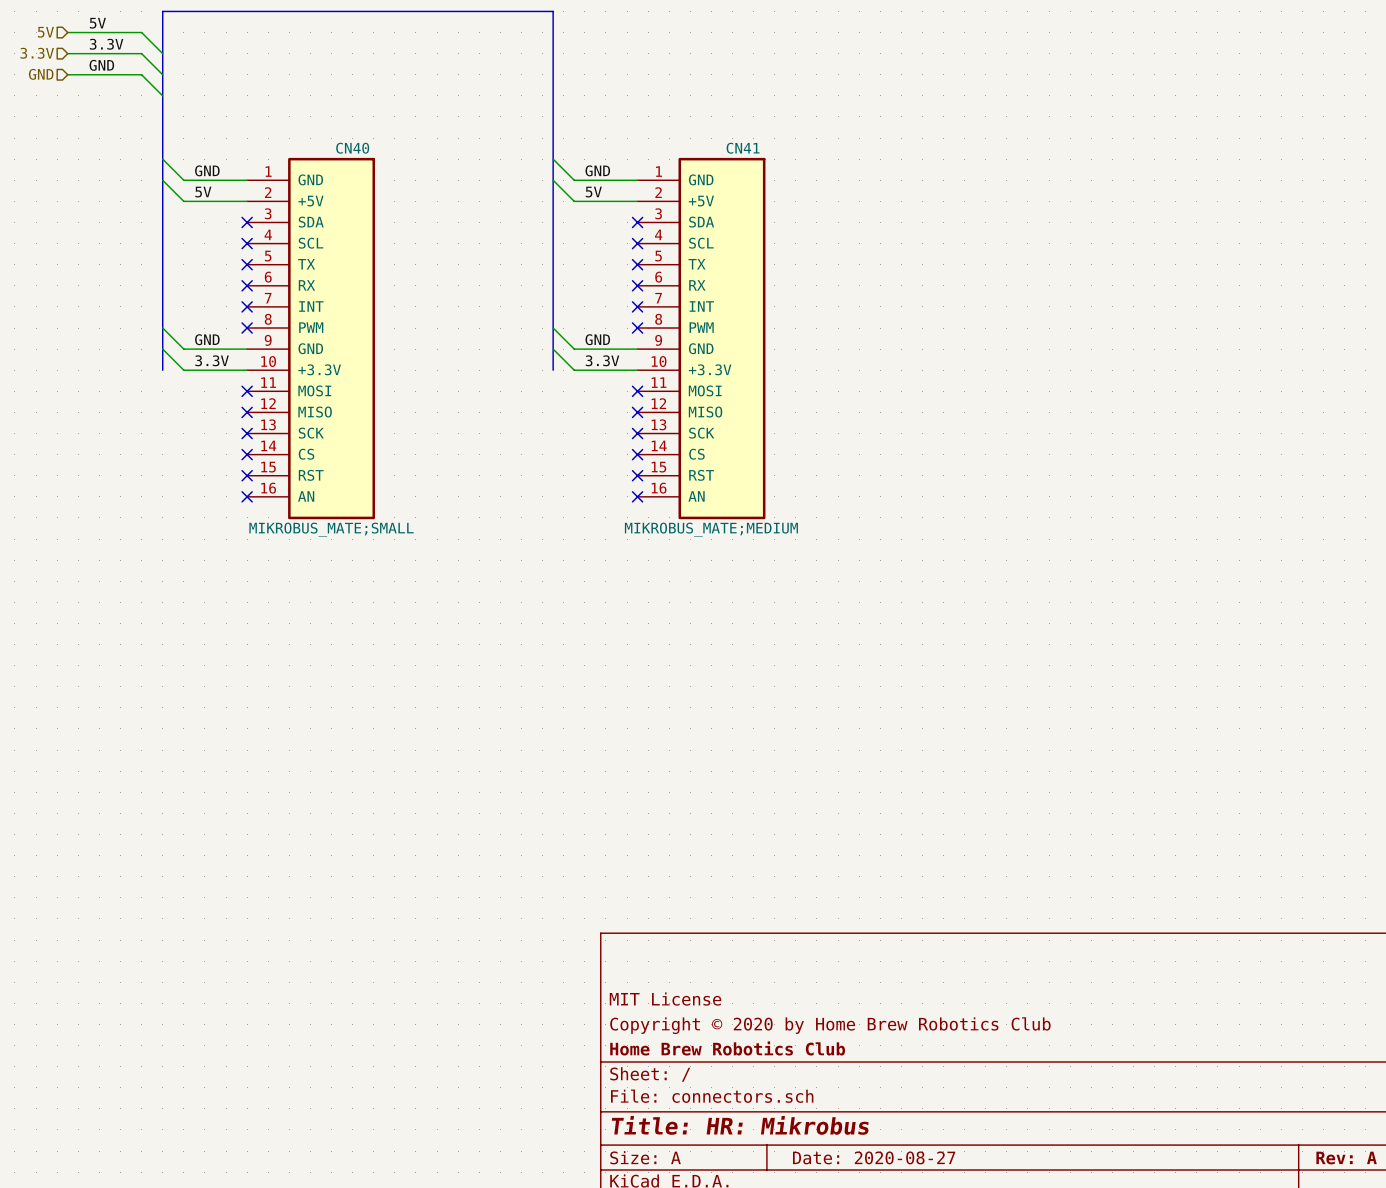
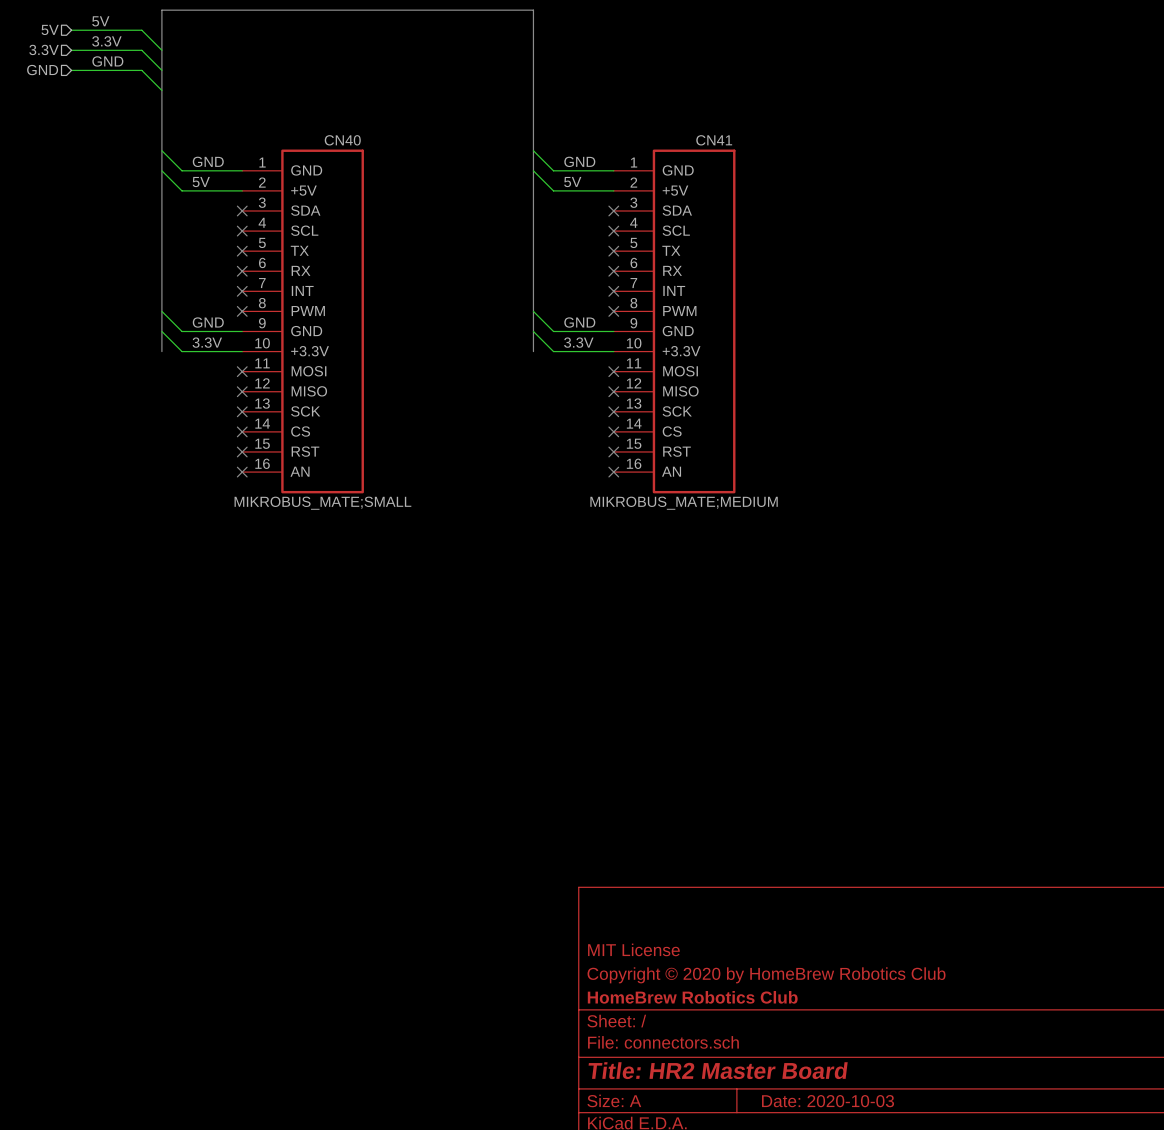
title block: Copyright © 2020 by Home Brew Robotics Club (830, 1025) -> Copyright © 2020 by HomeBrew Robotics Club (766, 975)
title block: Home Brew Robotics Club (727, 1048) -> HomeBrew Robotics Club (692, 997)
title block: Title: HR: Mikrobus (740, 1125) -> Title: HR2 Master Board (718, 1070)
title block: Date: 2020-08-27 (874, 1157) -> Date: 2020-10-03 (828, 1101)

